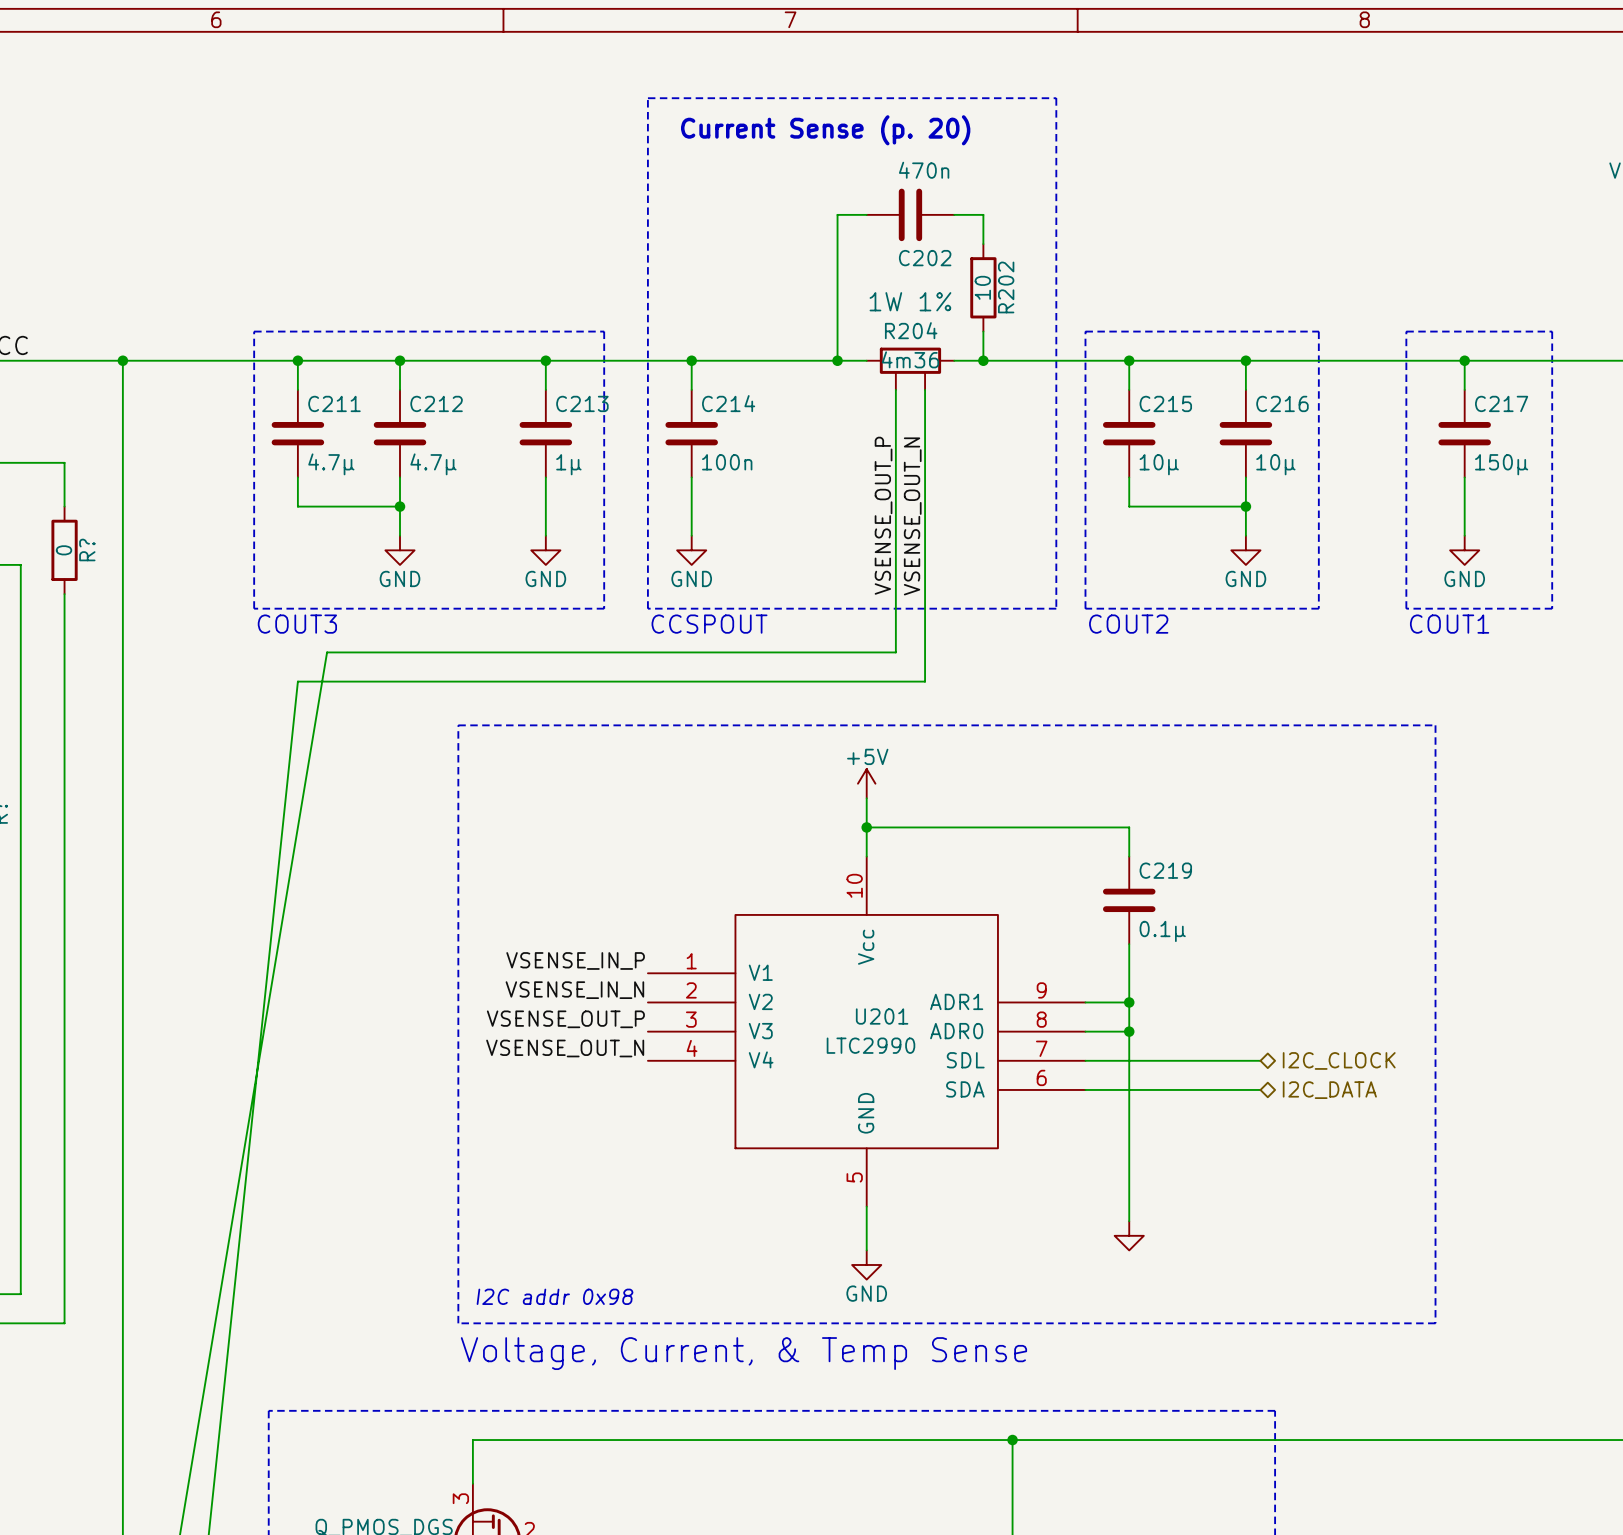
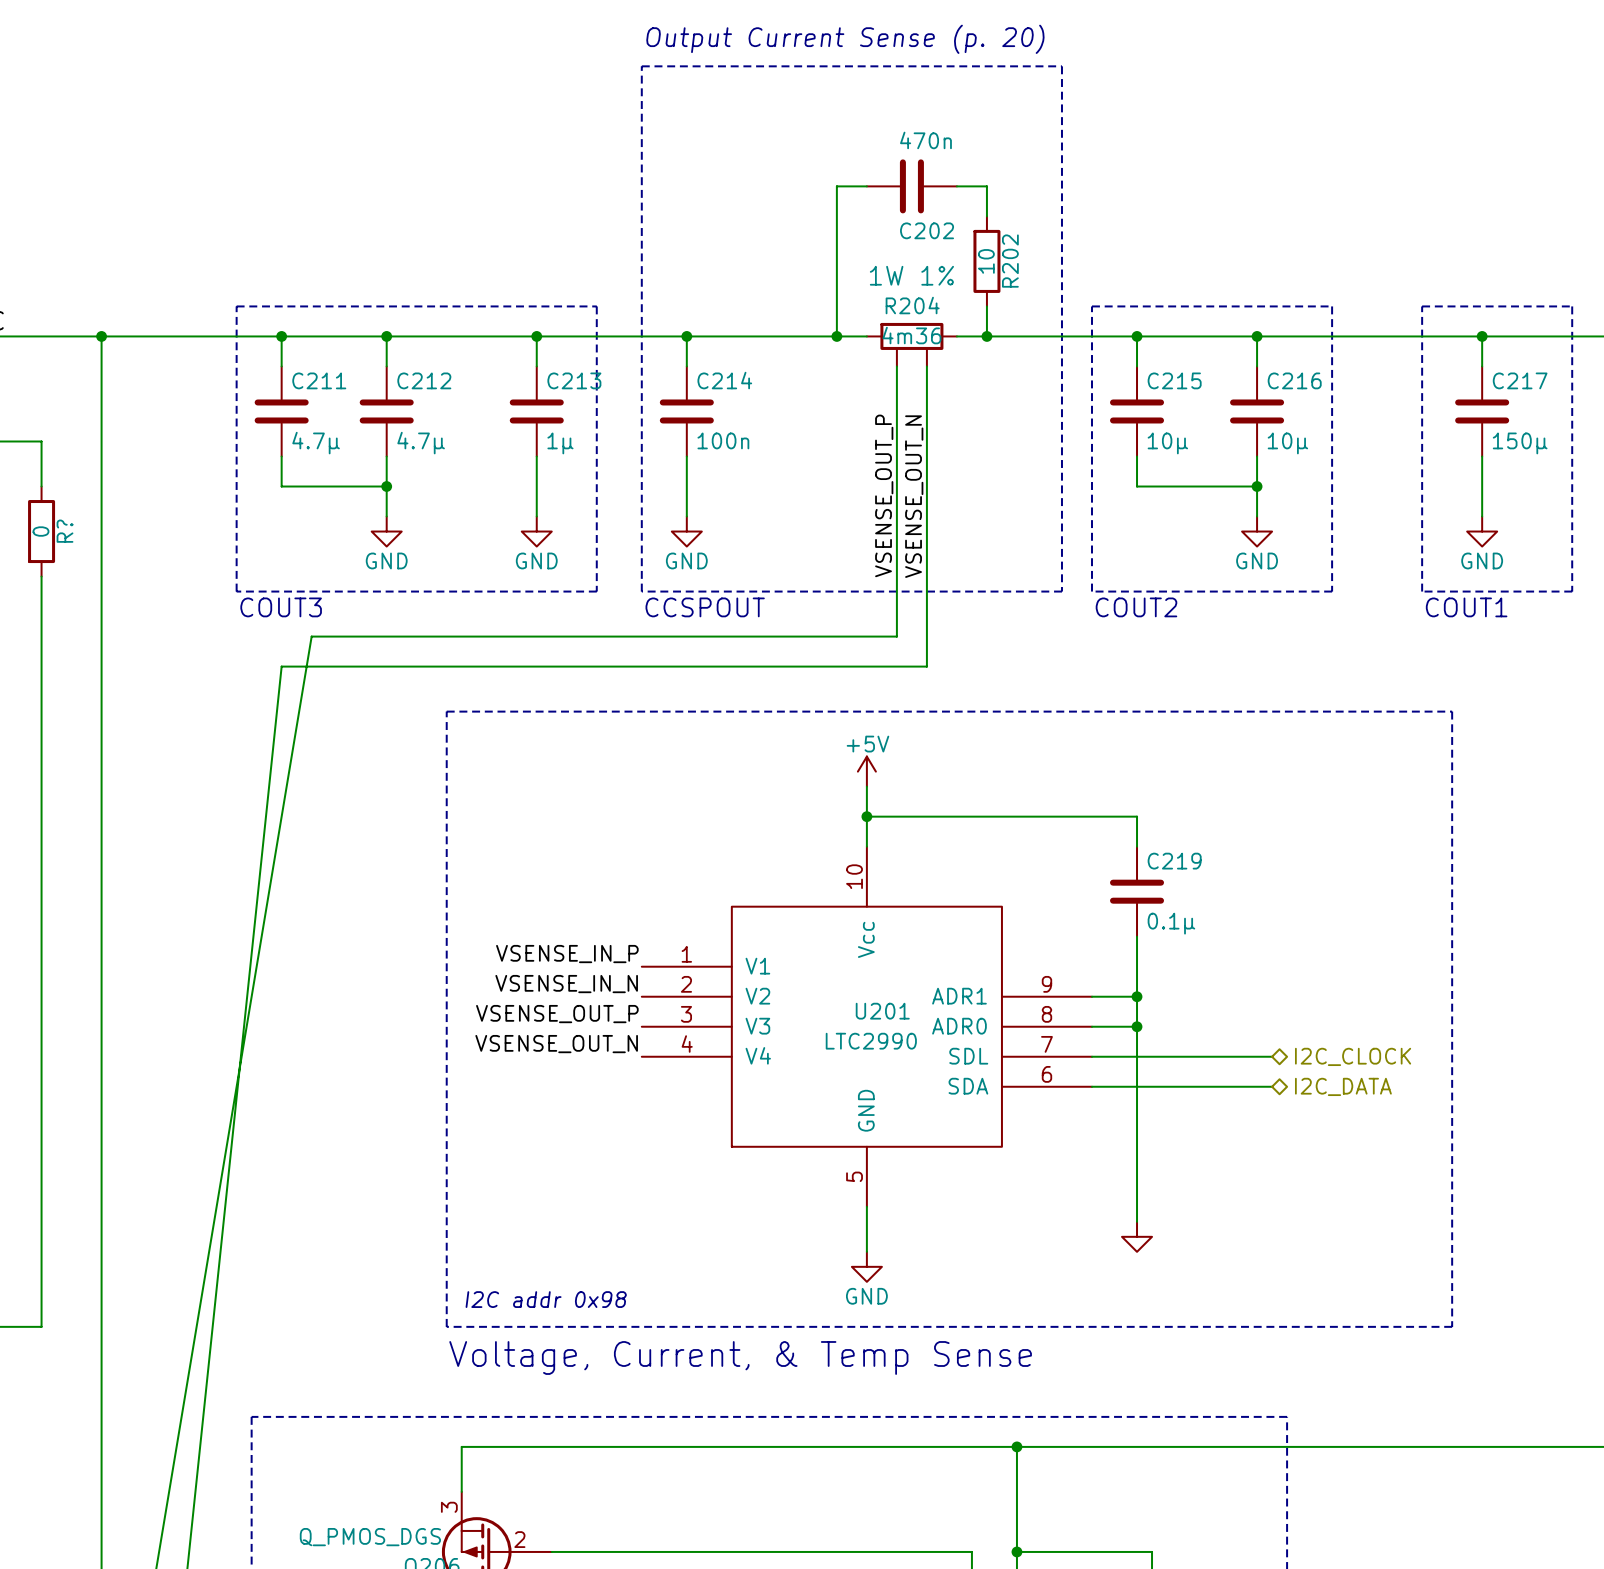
text: none -> Output Current Sense (p. 20) (845, 39)
text: Current Sense (p. 20) (825, 130) -> none

